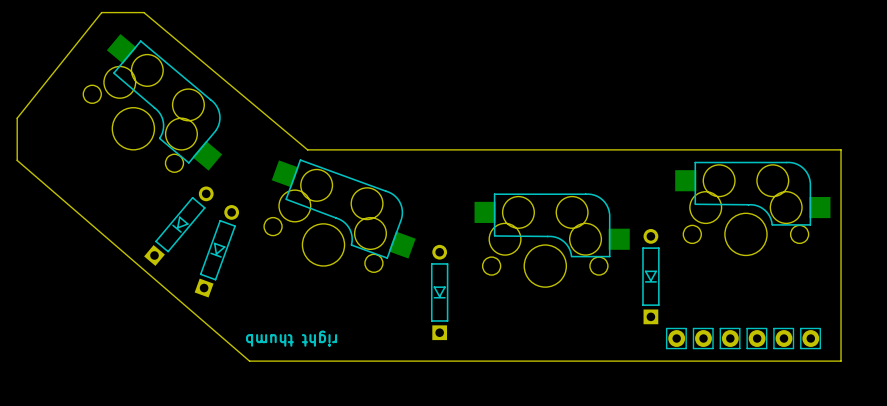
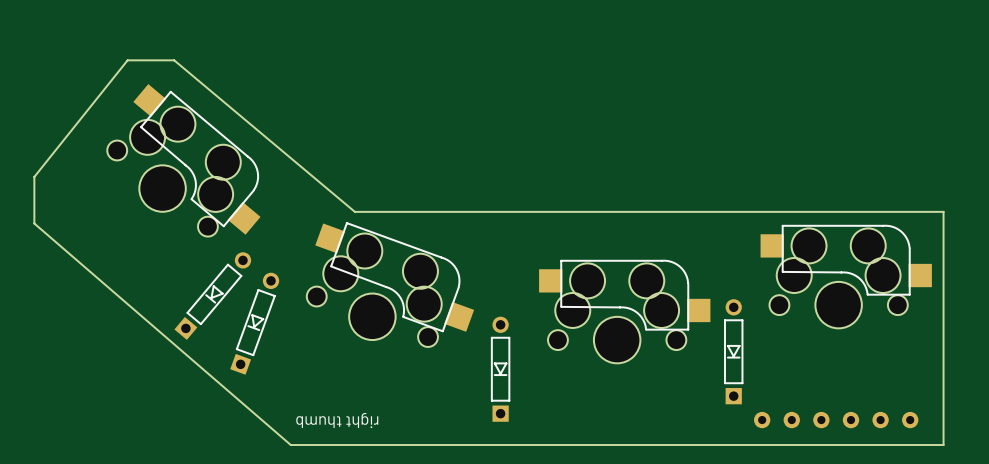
part footprint: [666, 327, 687, 350] -> [754, 411, 771, 429]
part footprint: [692, 327, 714, 350] -> [783, 411, 800, 429]
part footprint: [719, 327, 741, 350] -> [813, 411, 830, 429]
part footprint: [746, 327, 768, 350] -> [842, 411, 860, 429]
part footprint: [773, 327, 795, 350] -> [872, 411, 889, 429]
part footprint: [800, 327, 821, 350] -> [902, 411, 919, 429]

